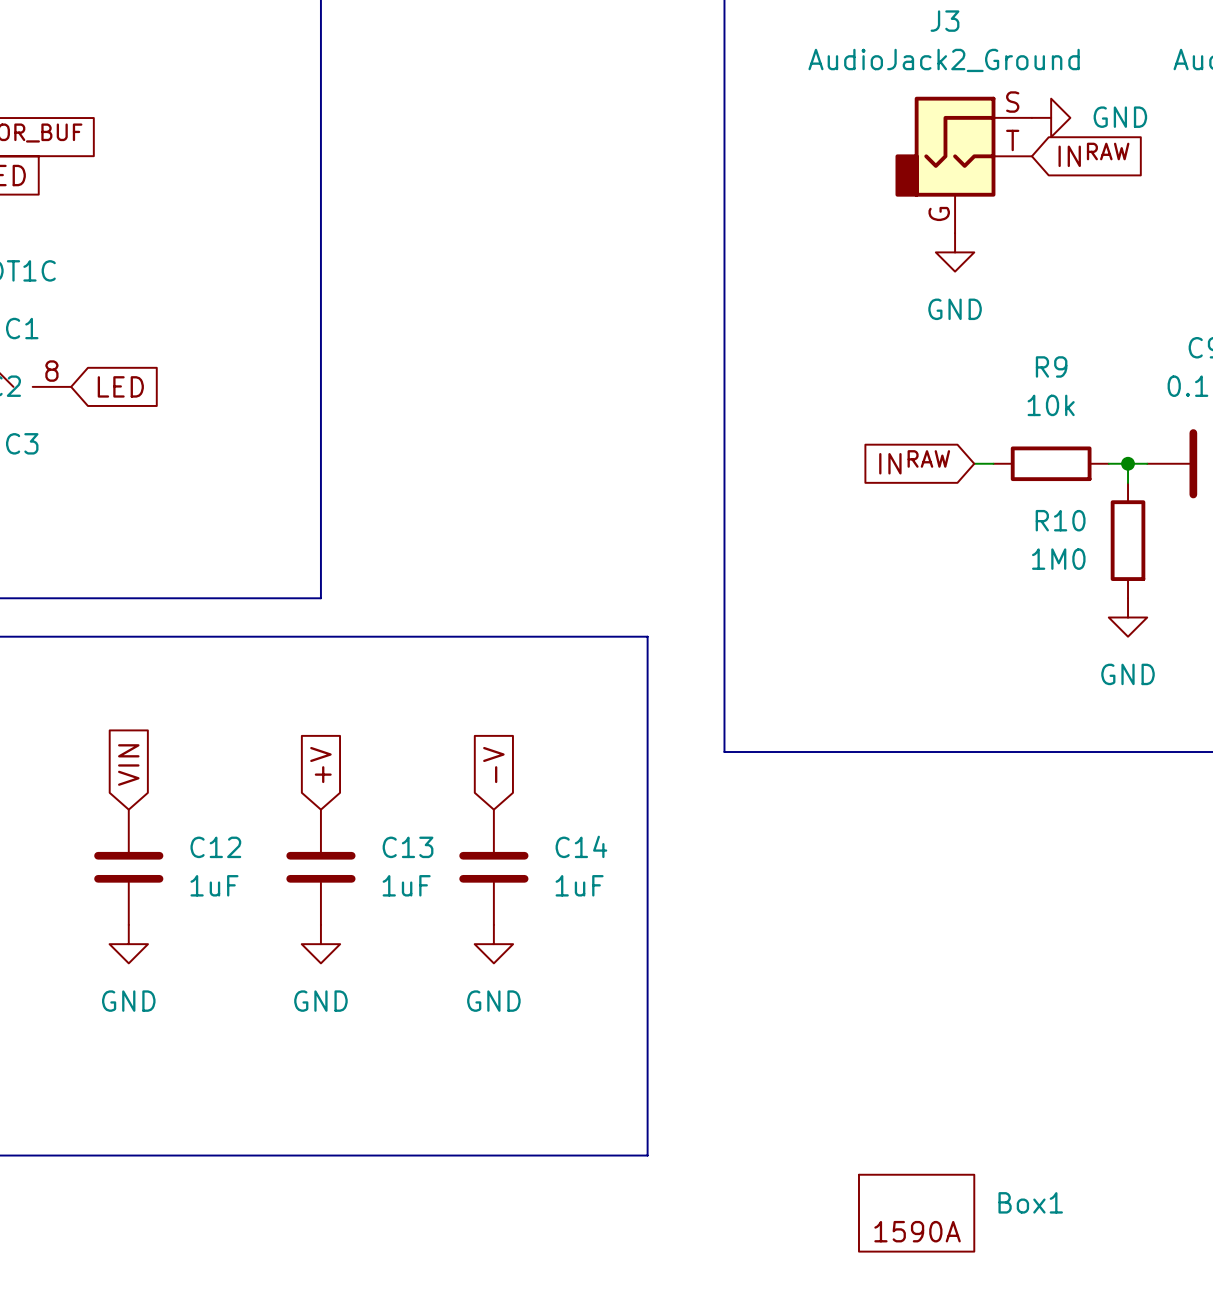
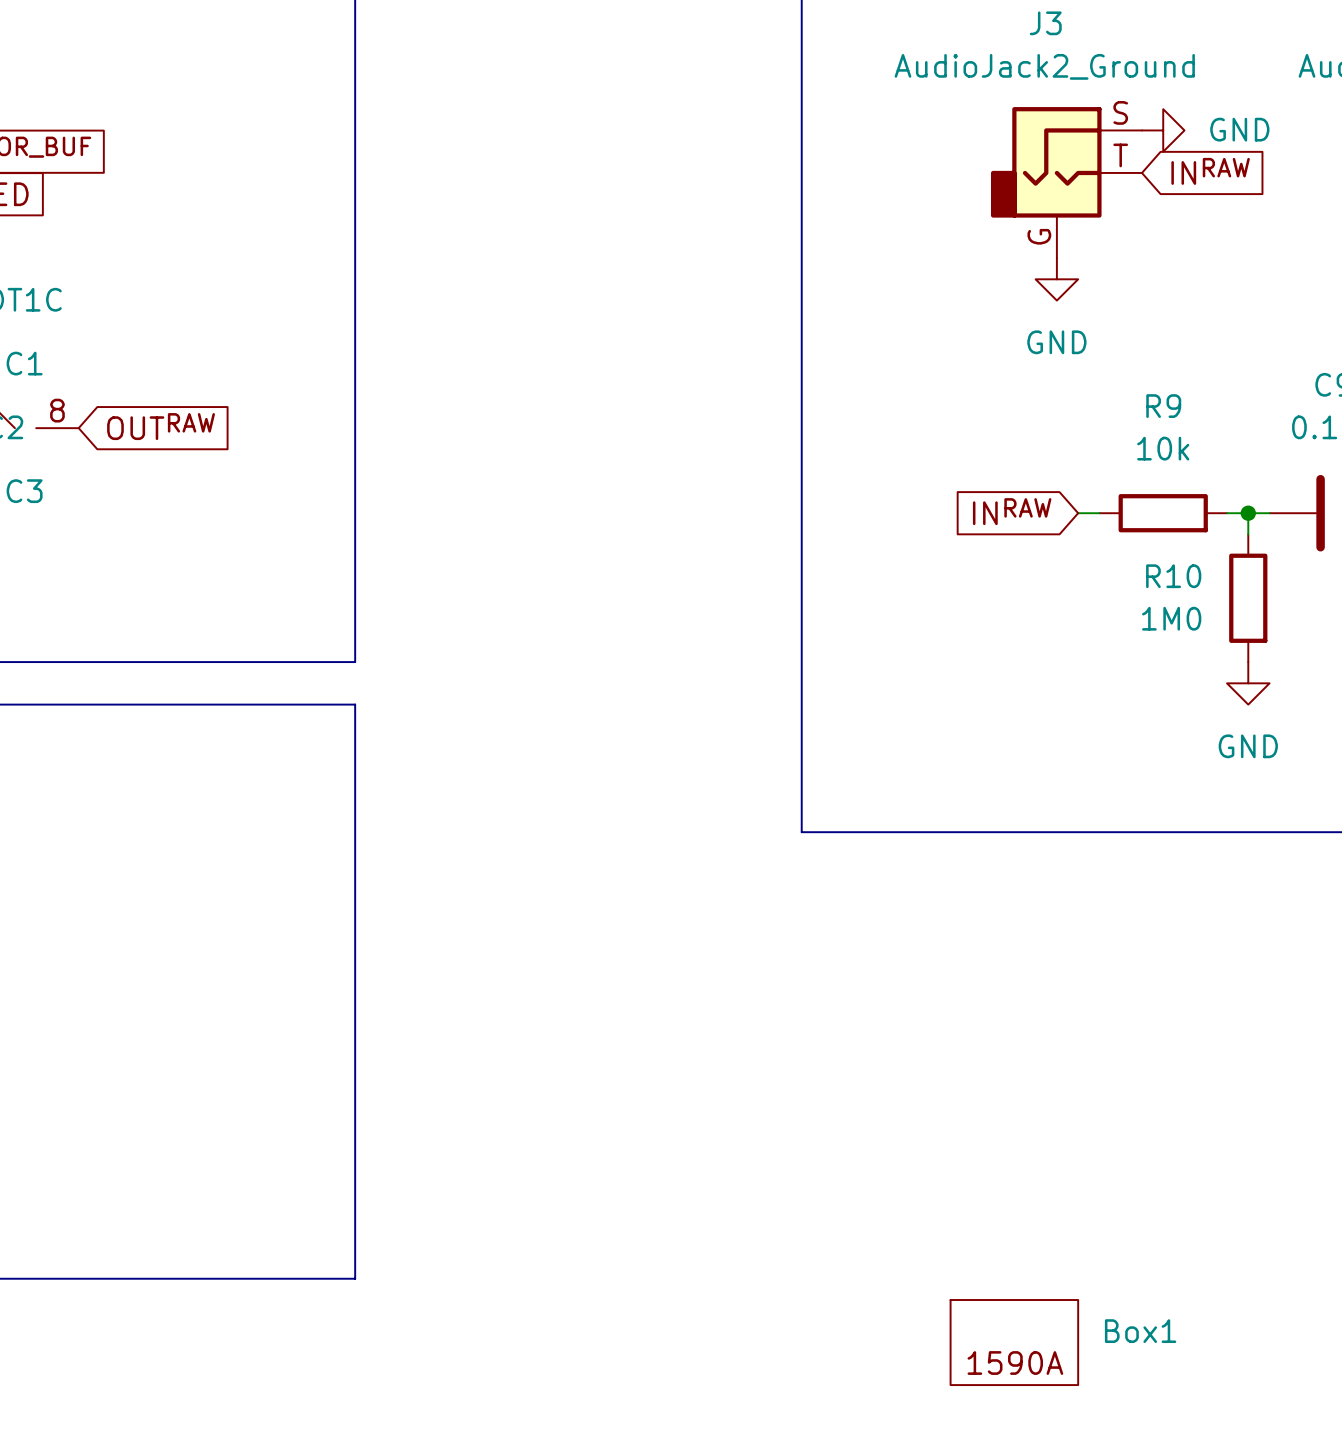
global label: LED (120, 386) -> OUTRAW (161, 426)
line: (320, 636) (647, 636) (647, 1155) (320, 1155) -> (355, 704) (355, 1278)
global label: VIN (128, 765) -> none
global label: +V (320, 765) -> none
global label: -V (493, 765) -> none
C12: 1uF (128, 867) -> none
C13: 1uF (320, 867) -> none
C14: 1uF (493, 867) -> none
power symbol: GND (128, 944) -> none
power symbol: GND (320, 944) -> none
power symbol: GND (493, 944) -> none

